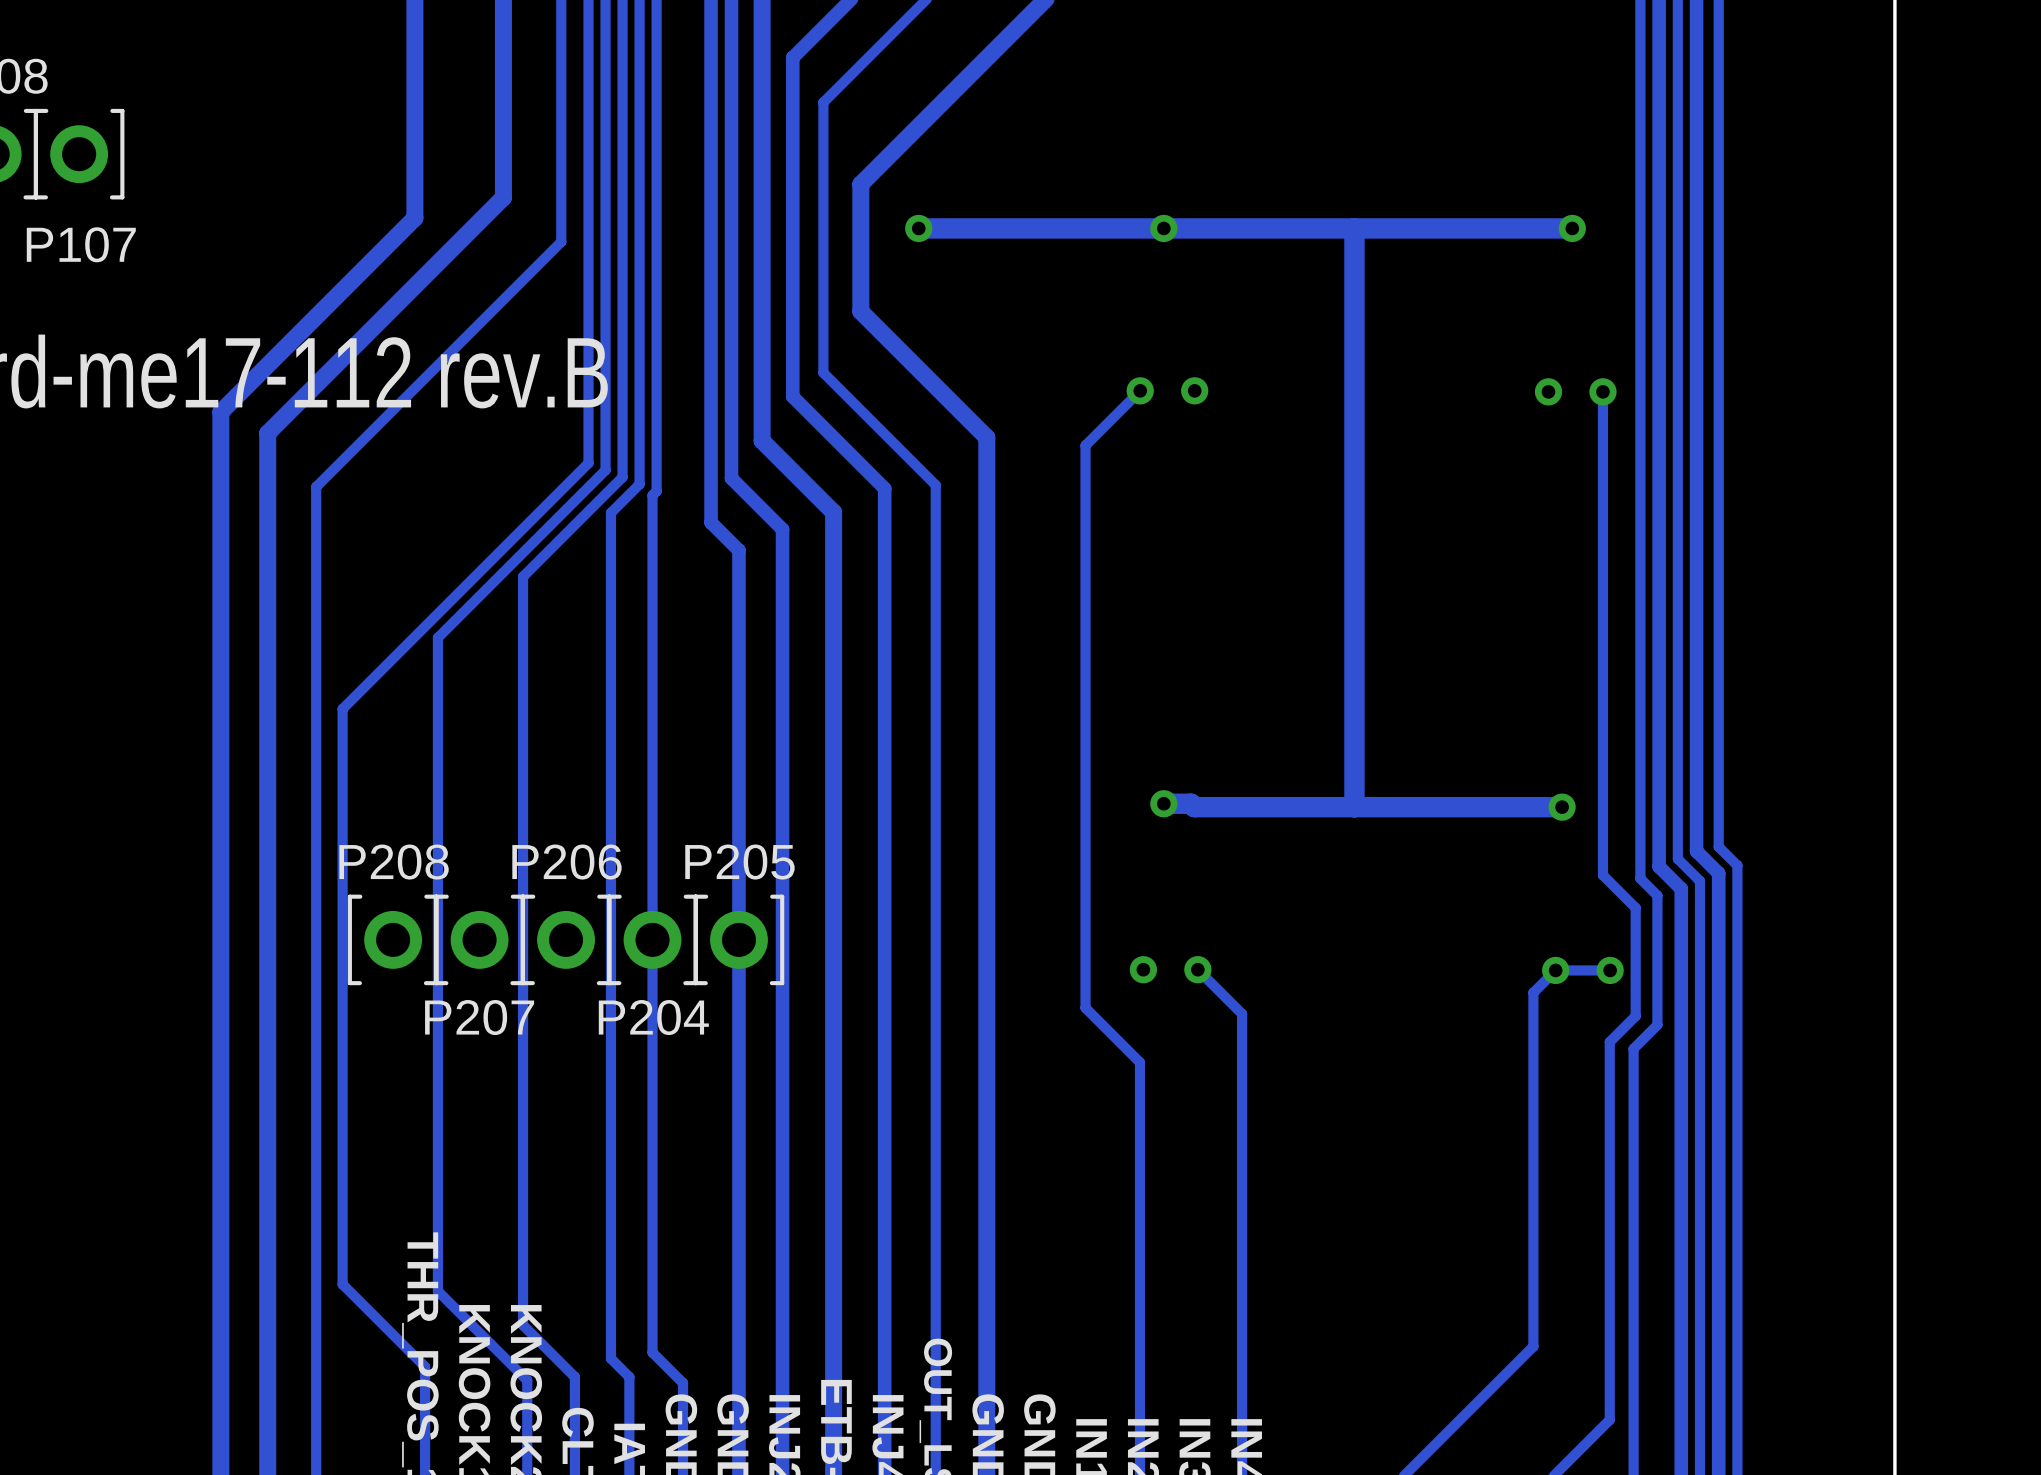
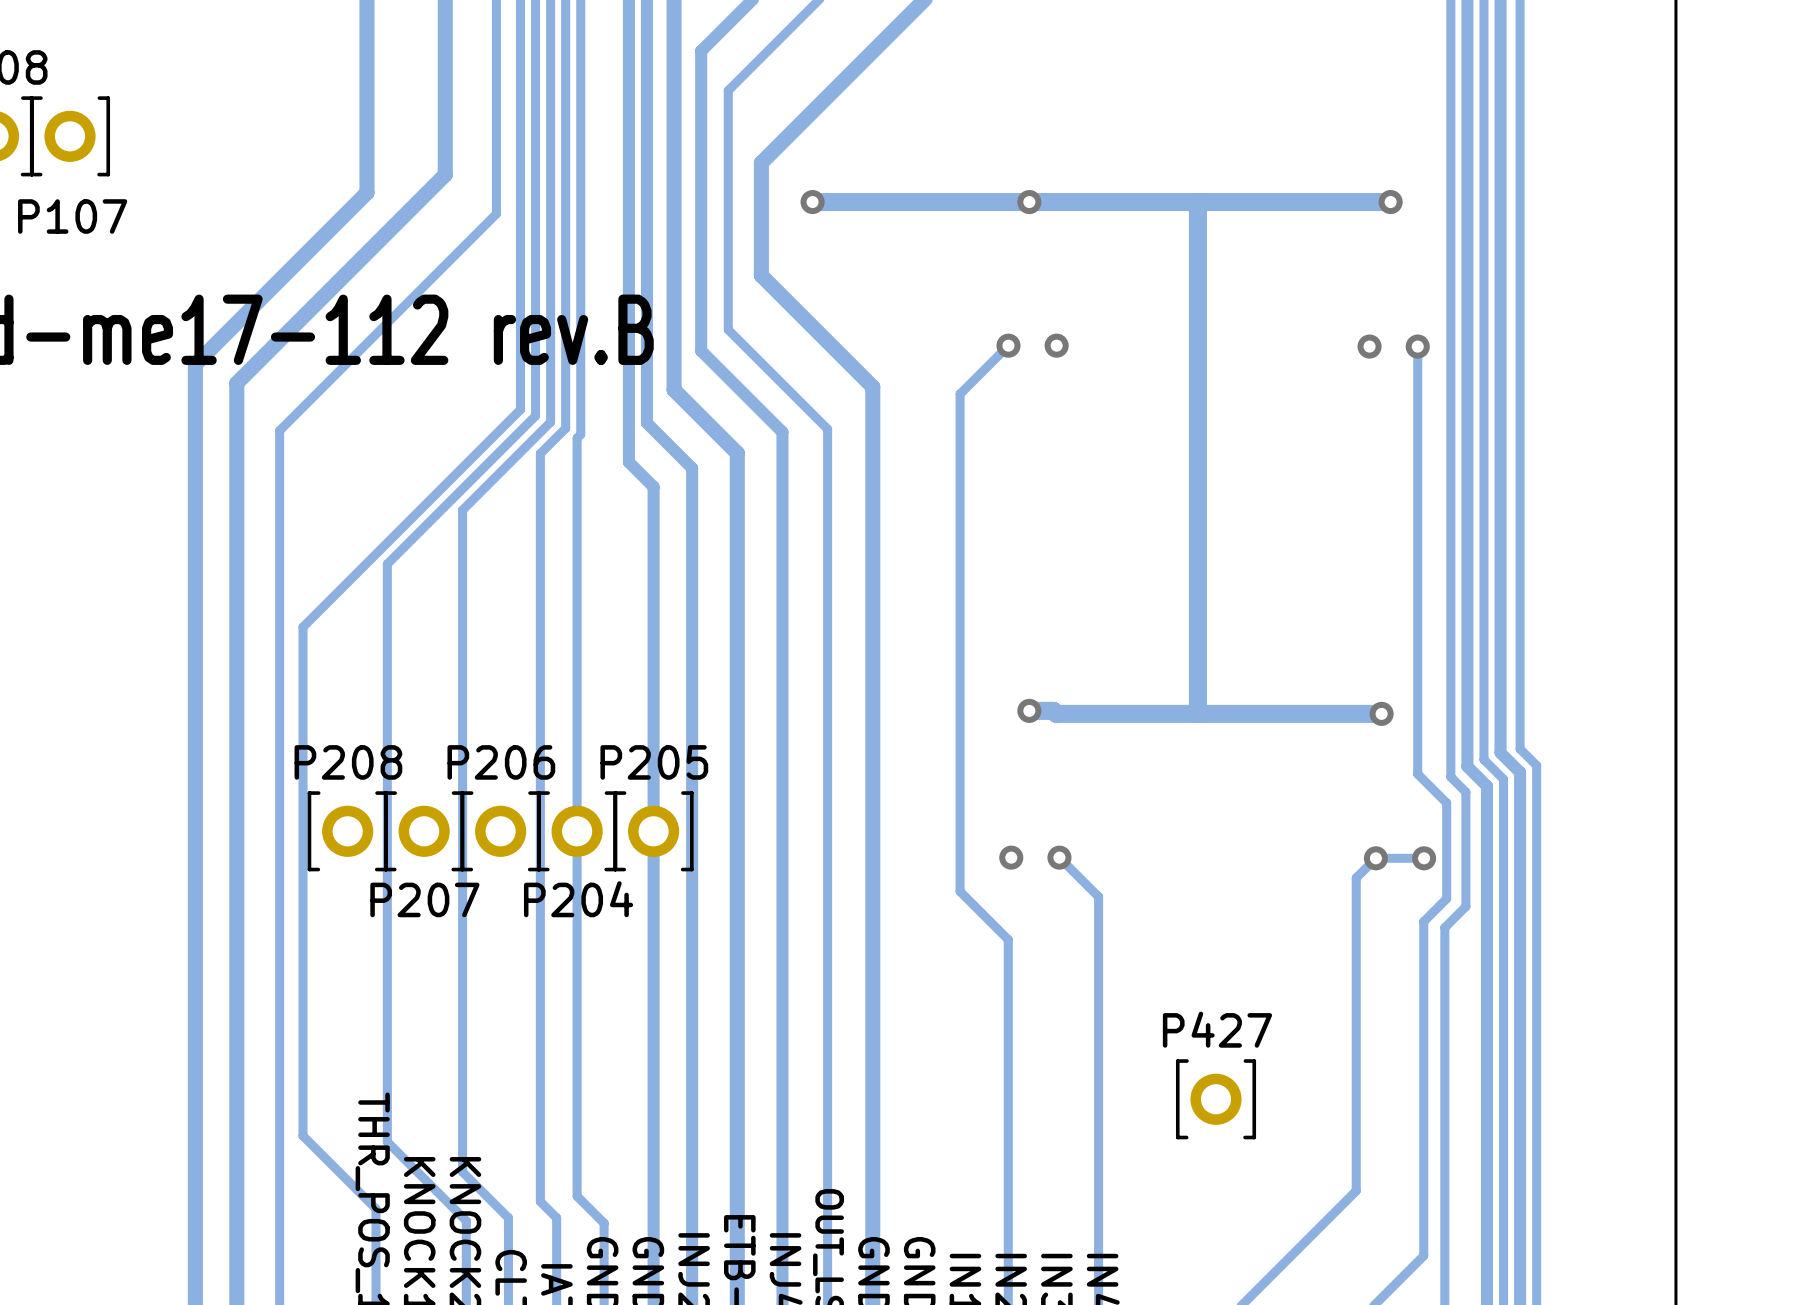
P427: none -> (1216, 1099)

